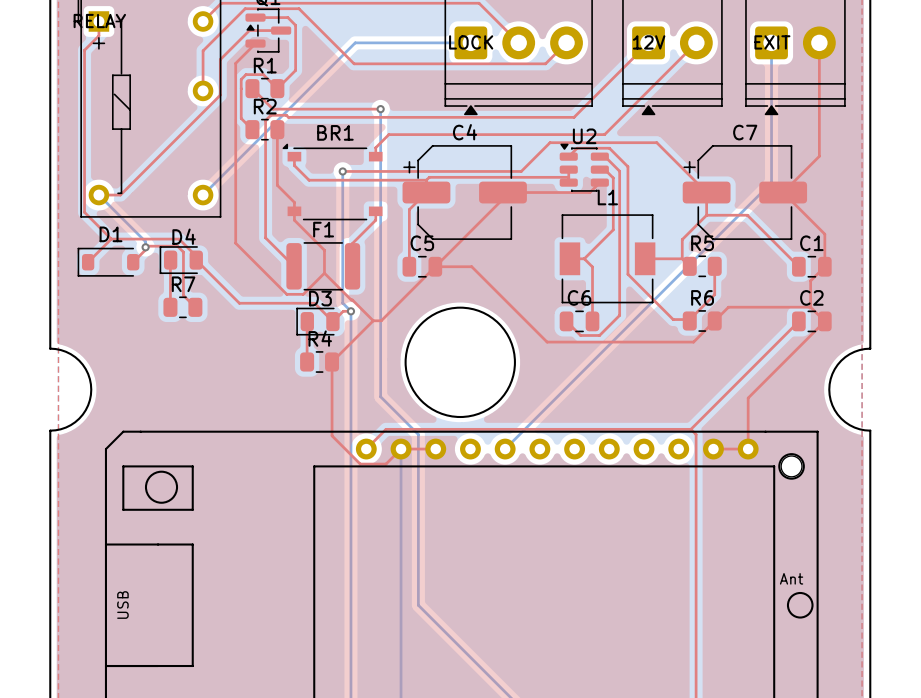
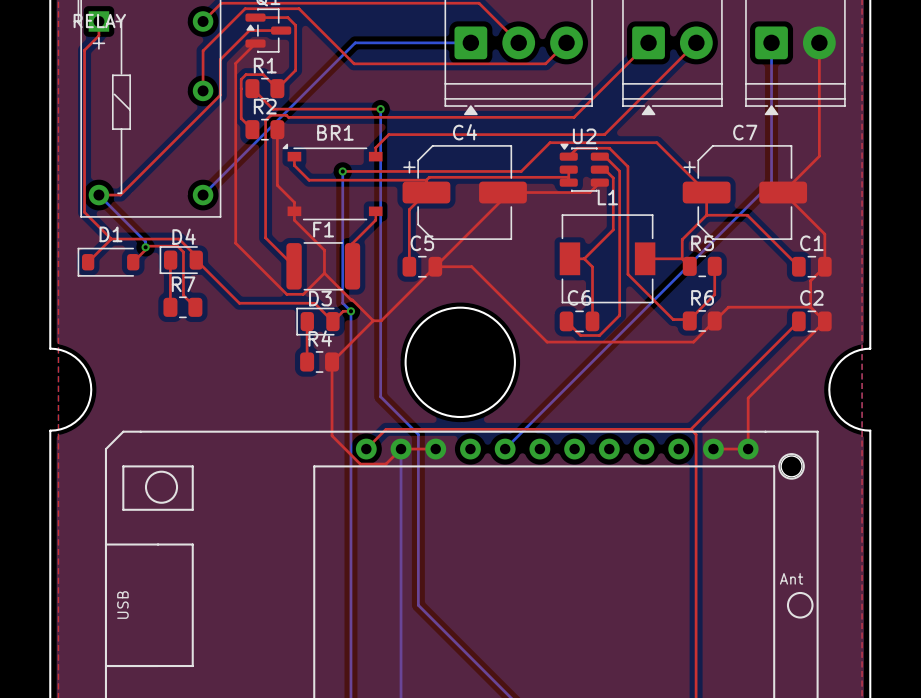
text: LOCK (471, 42) -> none
text: 12V (649, 42) -> none
text: EXIT (772, 42) -> none

